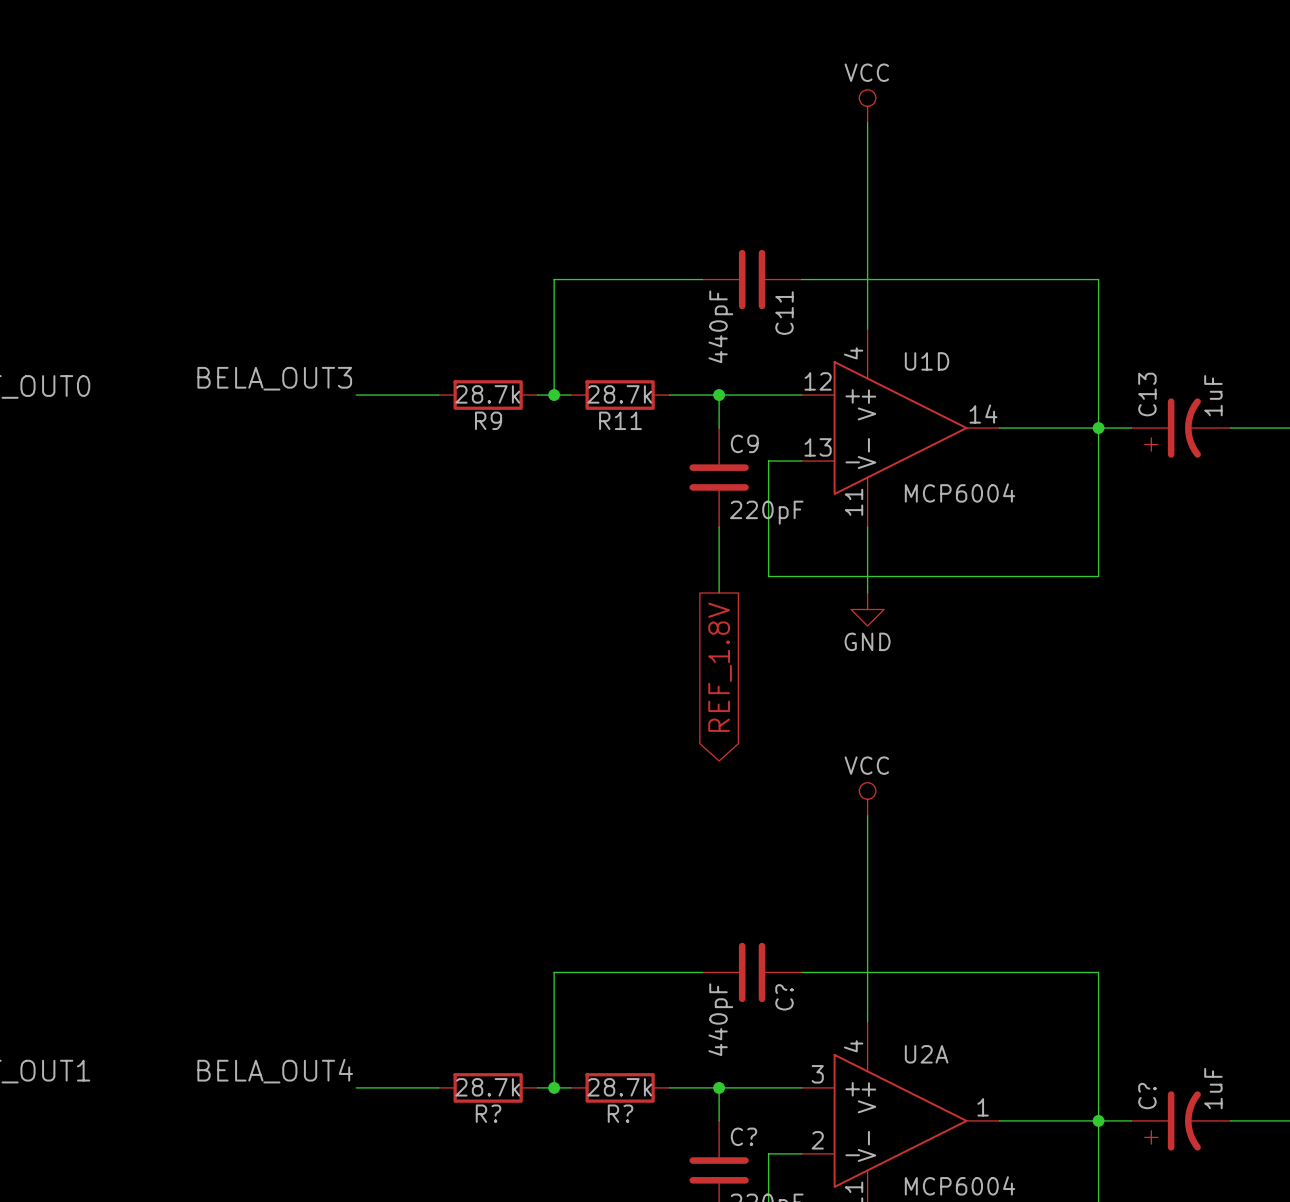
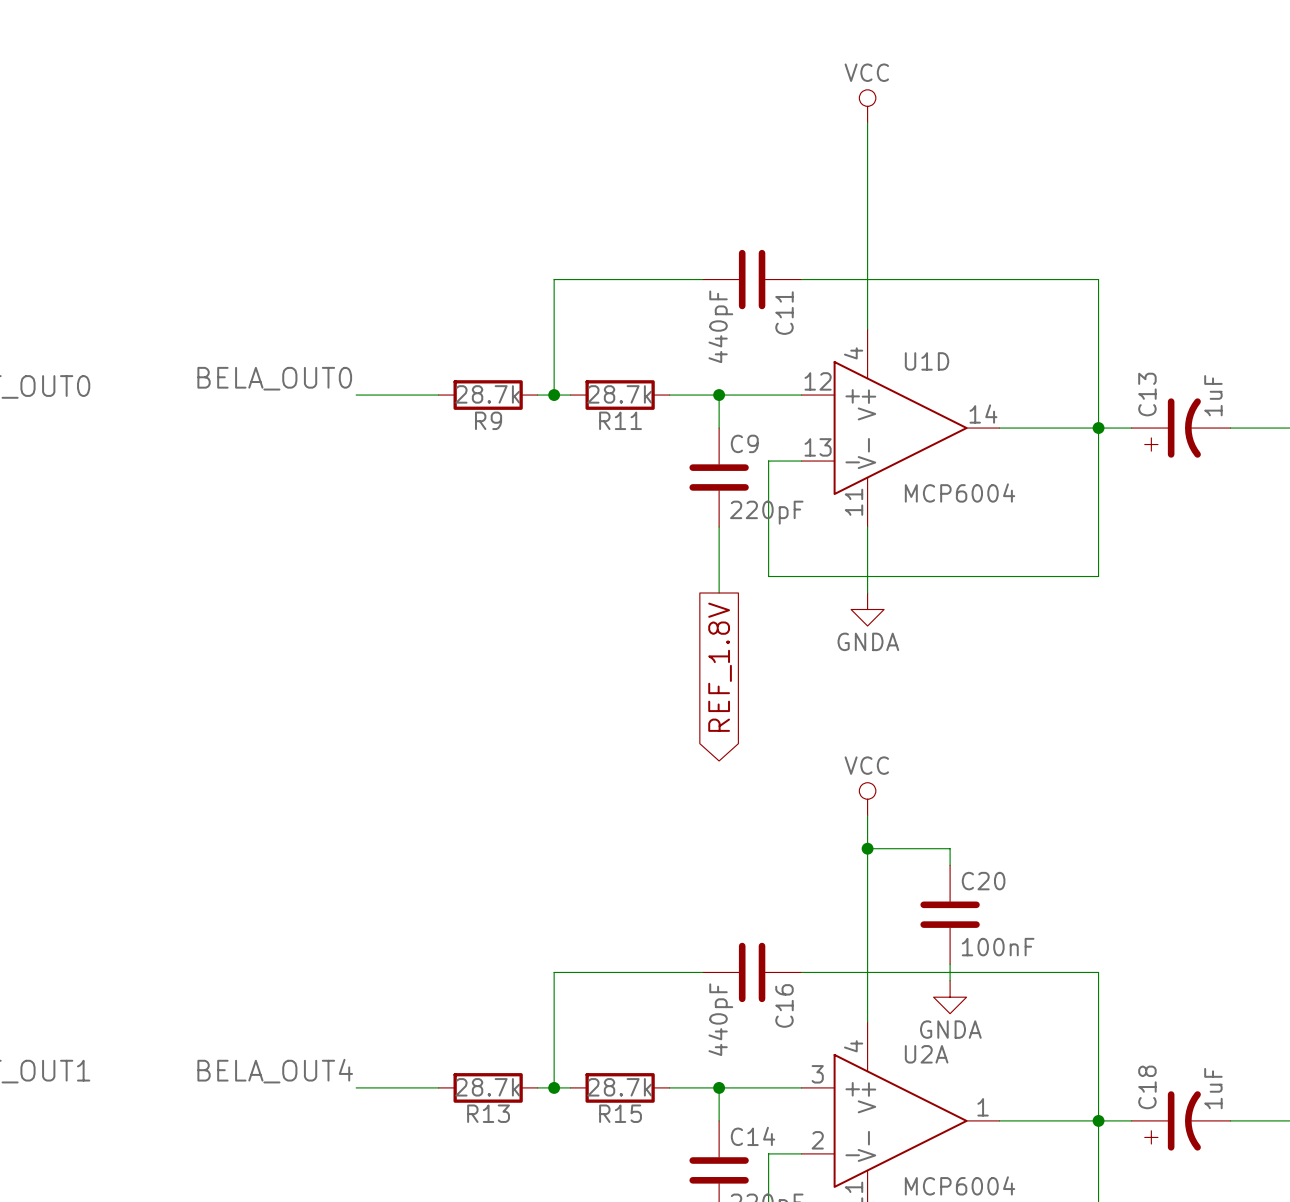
label: BELA_OUT3 (274, 378) -> BELA_OUT0 (274, 378)
power symbol: GND (867, 609) -> GNDA (867, 609)
wire: none -> (867, 848) (950, 848) (950, 865)
junction: none -> (867, 848)
C20: none -> 100nF (950, 914)
wire: none -> (950, 964) (950, 980)
C? name: C? (784, 997) -> C16 (784, 1005)
power symbol: none -> GNDA (950, 997)
C? name: C? (1147, 1096) -> C18 (1147, 1087)
R? name: R? (488, 1113) -> R13 (488, 1113)
R? name: R? (620, 1113) -> R15 (620, 1113)
C? name: C? (743, 1136) -> C14 (753, 1136)

